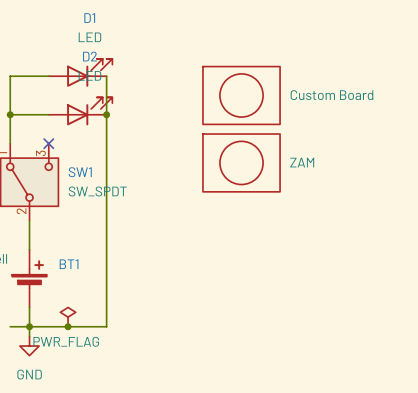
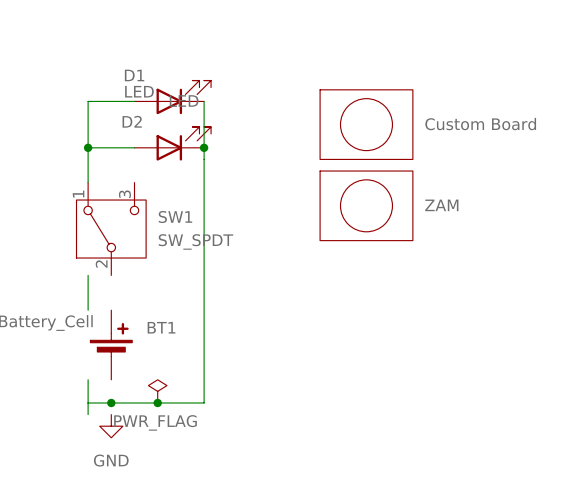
D1 name position: D1 (89, 18) -> D1 (134, 75)
D1 value position: LED (89, 37) -> LED (139, 91)
D2 name position: D2 (89, 56) -> D2 (132, 121)
no-connect mark: (48, 143) -> none
wire: (29, 220) (29, 249) -> (88, 275) (88, 310)
wire: (29, 307) (29, 336) -> (88, 379) (88, 414)

